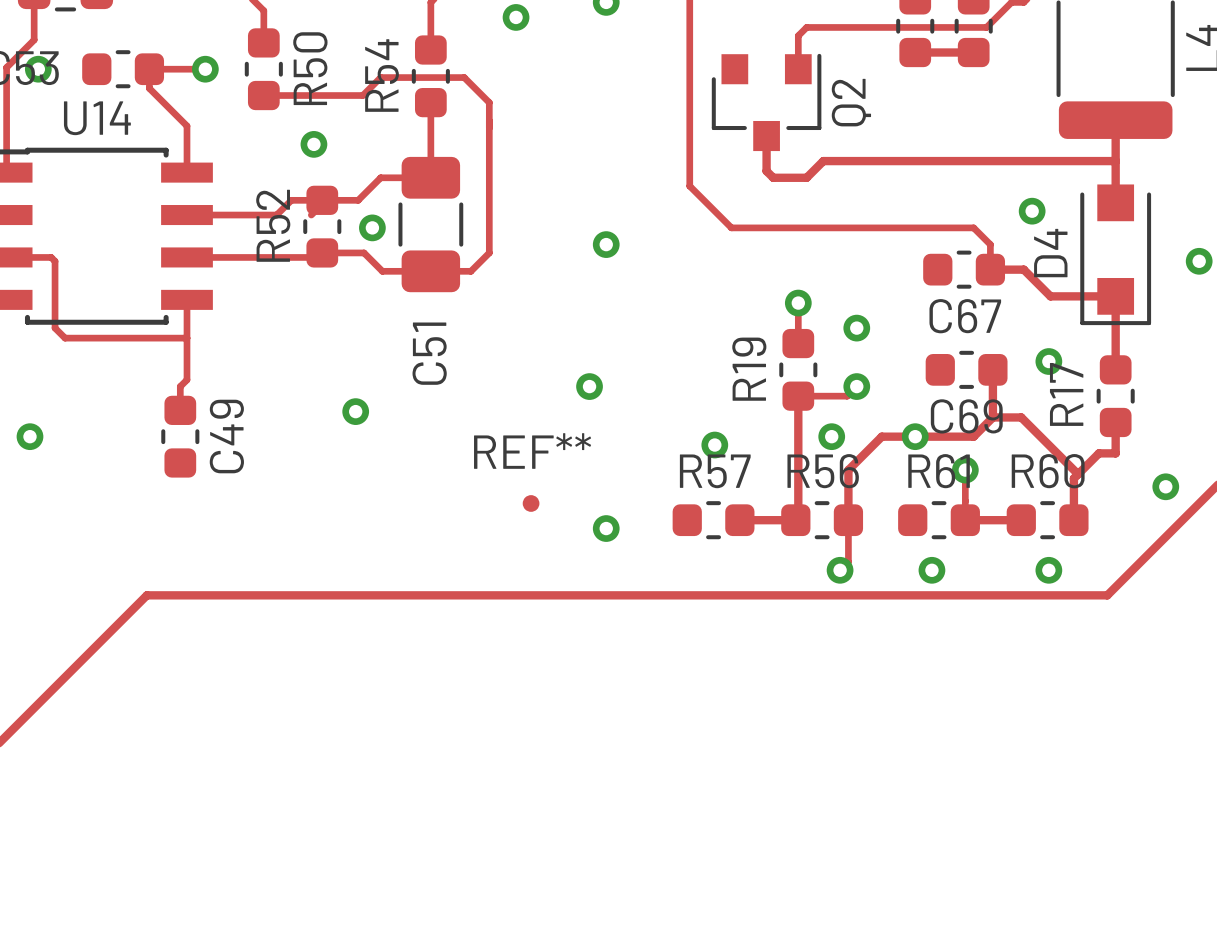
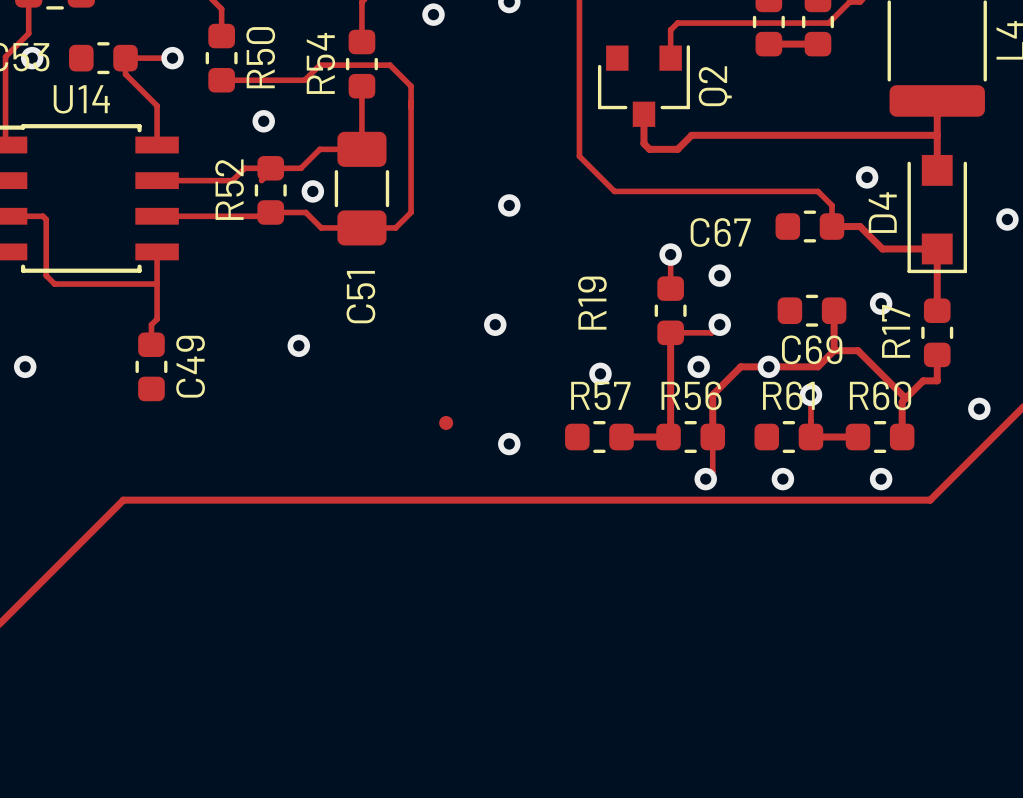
C67 name position: C67 (965, 316) -> C67 (720, 232)
R19 name position: R19 (749, 369) -> R19 (592, 303)
REF** name: REF** (532, 451) -> none

